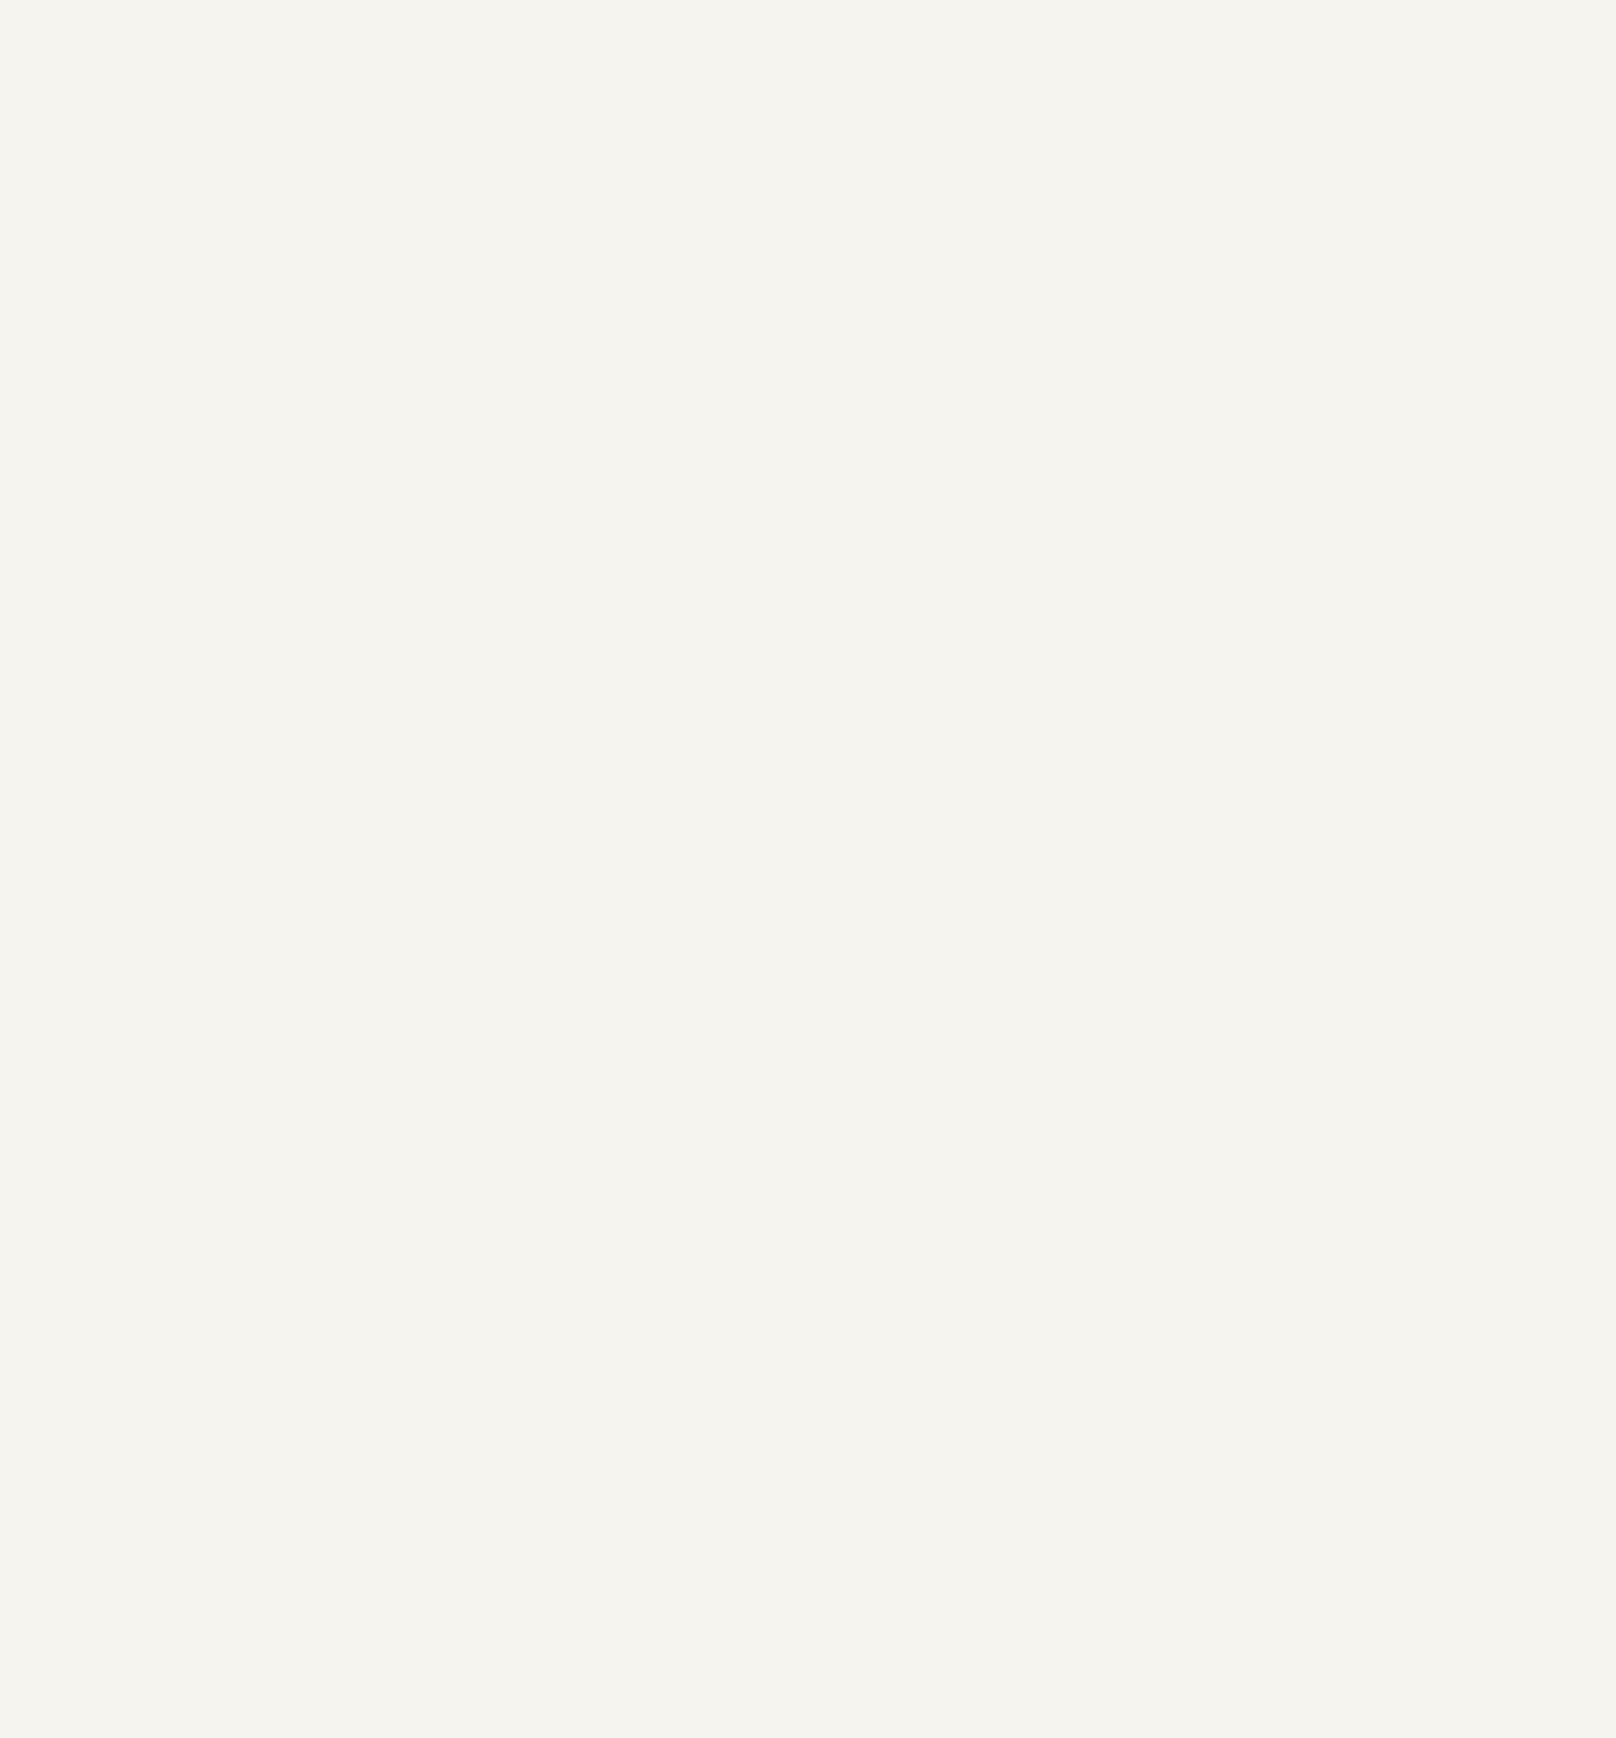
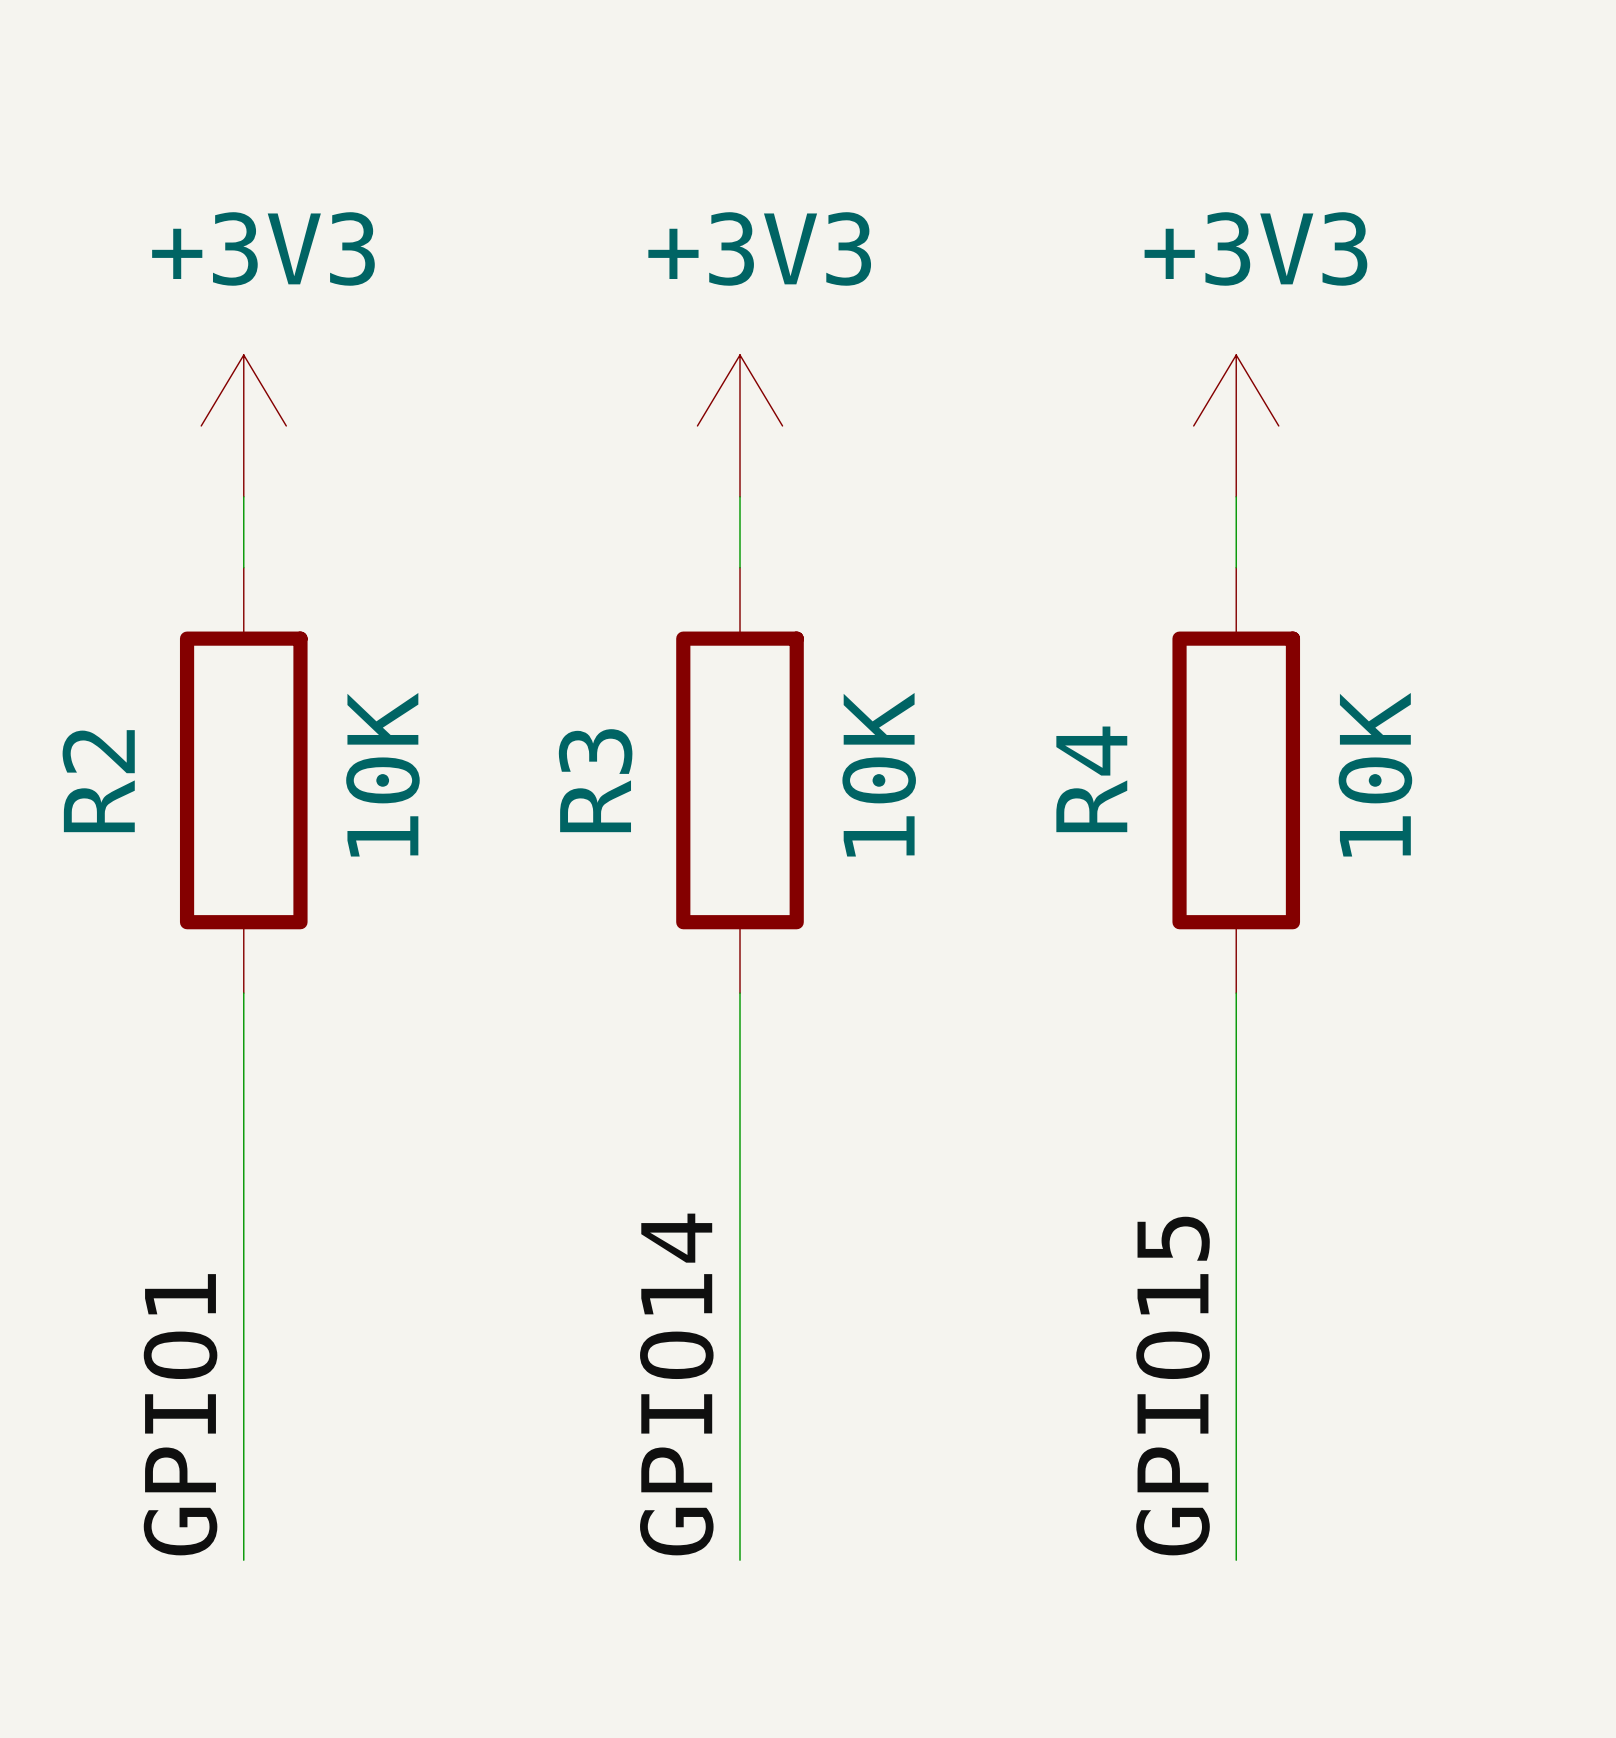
power symbol: none -> +3V3 (243, 425)
power symbol: none -> +3V3 (740, 425)
power symbol: none -> +3V3 (1236, 425)
wire: none -> (243, 496) (243, 567)
wire: none -> (740, 496) (740, 567)
wire: none -> (1236, 496) (1236, 567)
R2: none -> 10K (243, 780)
R3: none -> 10K (740, 780)
R4: none -> 10K (1236, 780)
wire: none -> (243, 993) (243, 1560)
wire: none -> (740, 993) (740, 1560)
wire: none -> (1236, 993) (1236, 1560)
label: none -> GPIO14 (676, 1384)
label: none -> GPIO15 (1173, 1386)
label: none -> GPIO1 (180, 1414)

